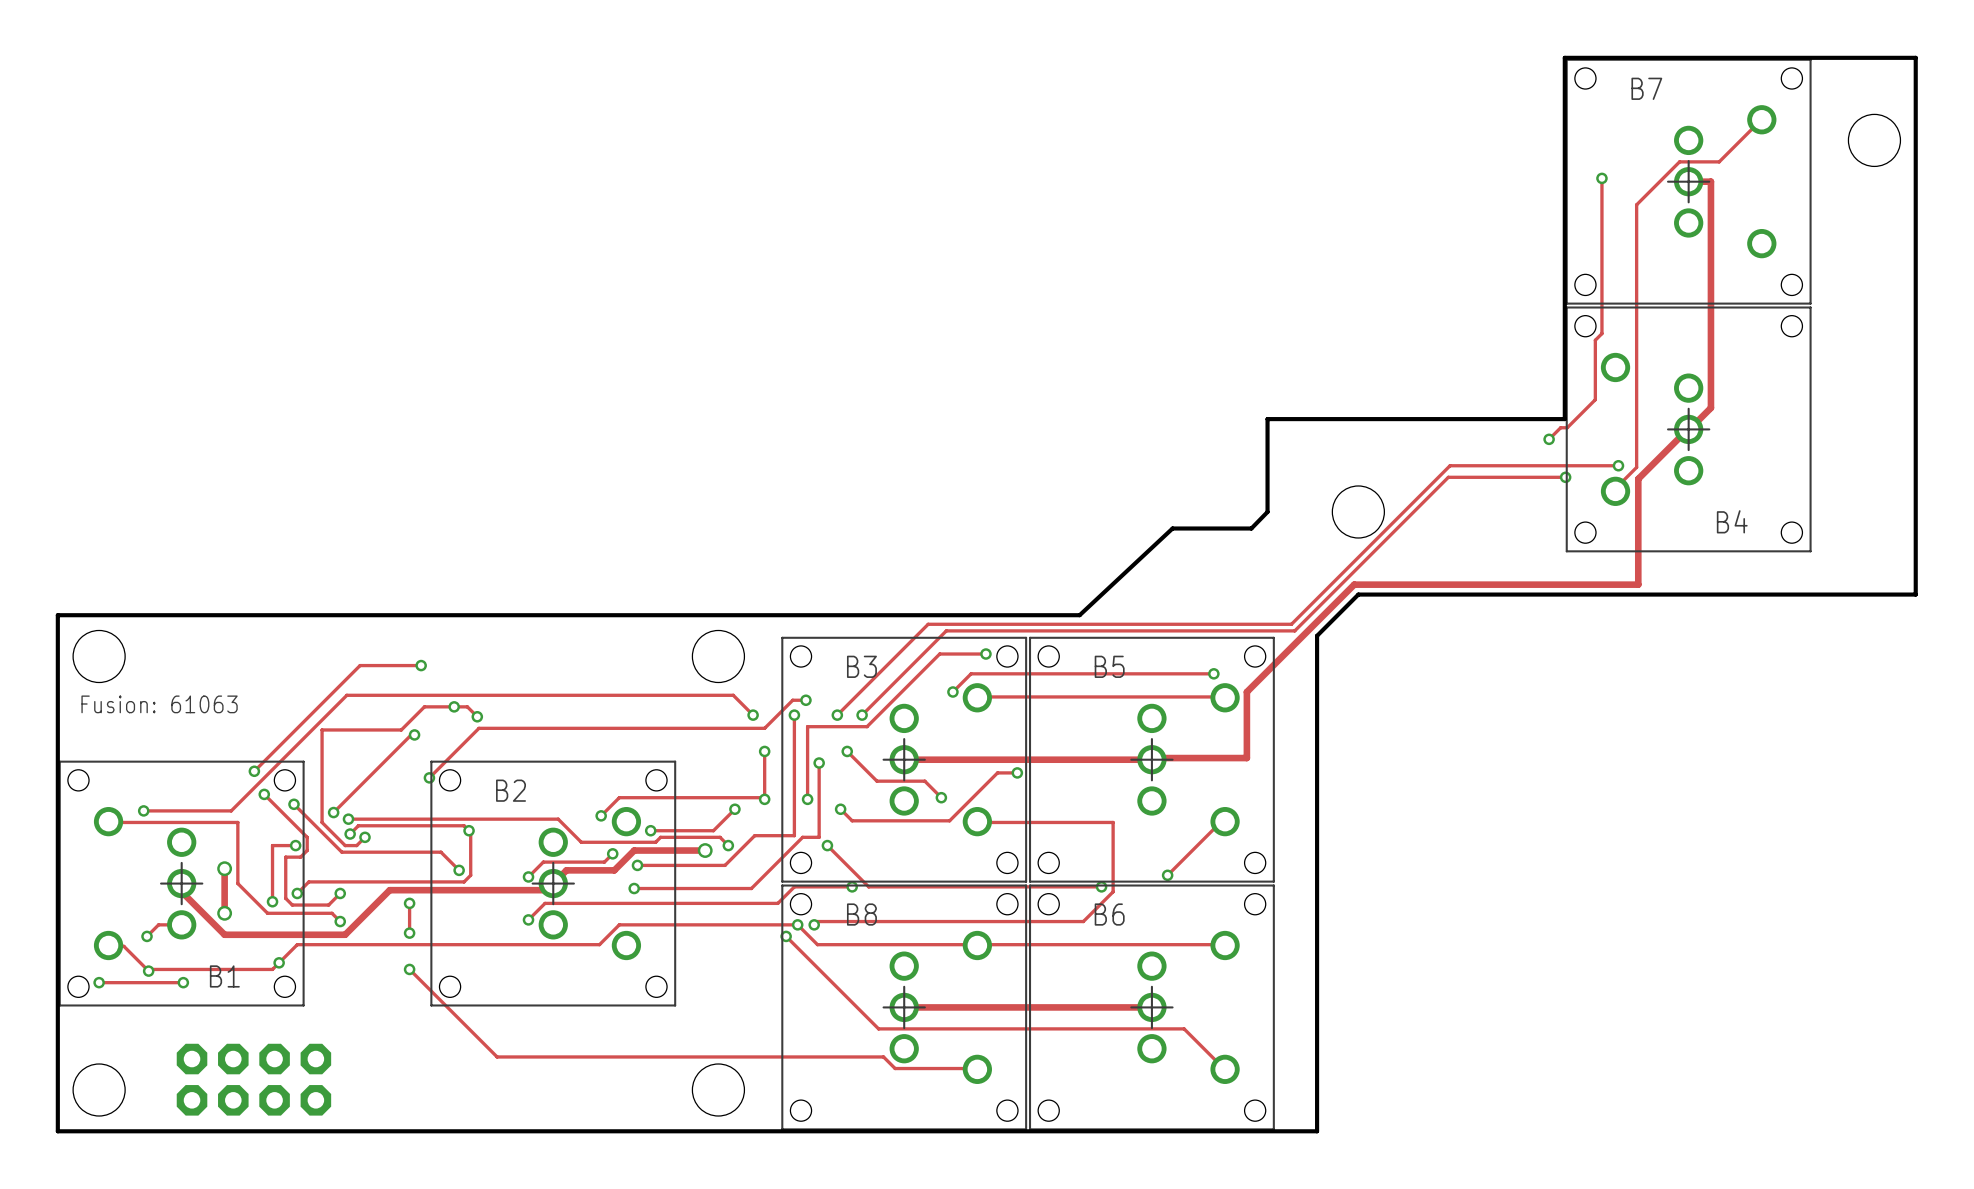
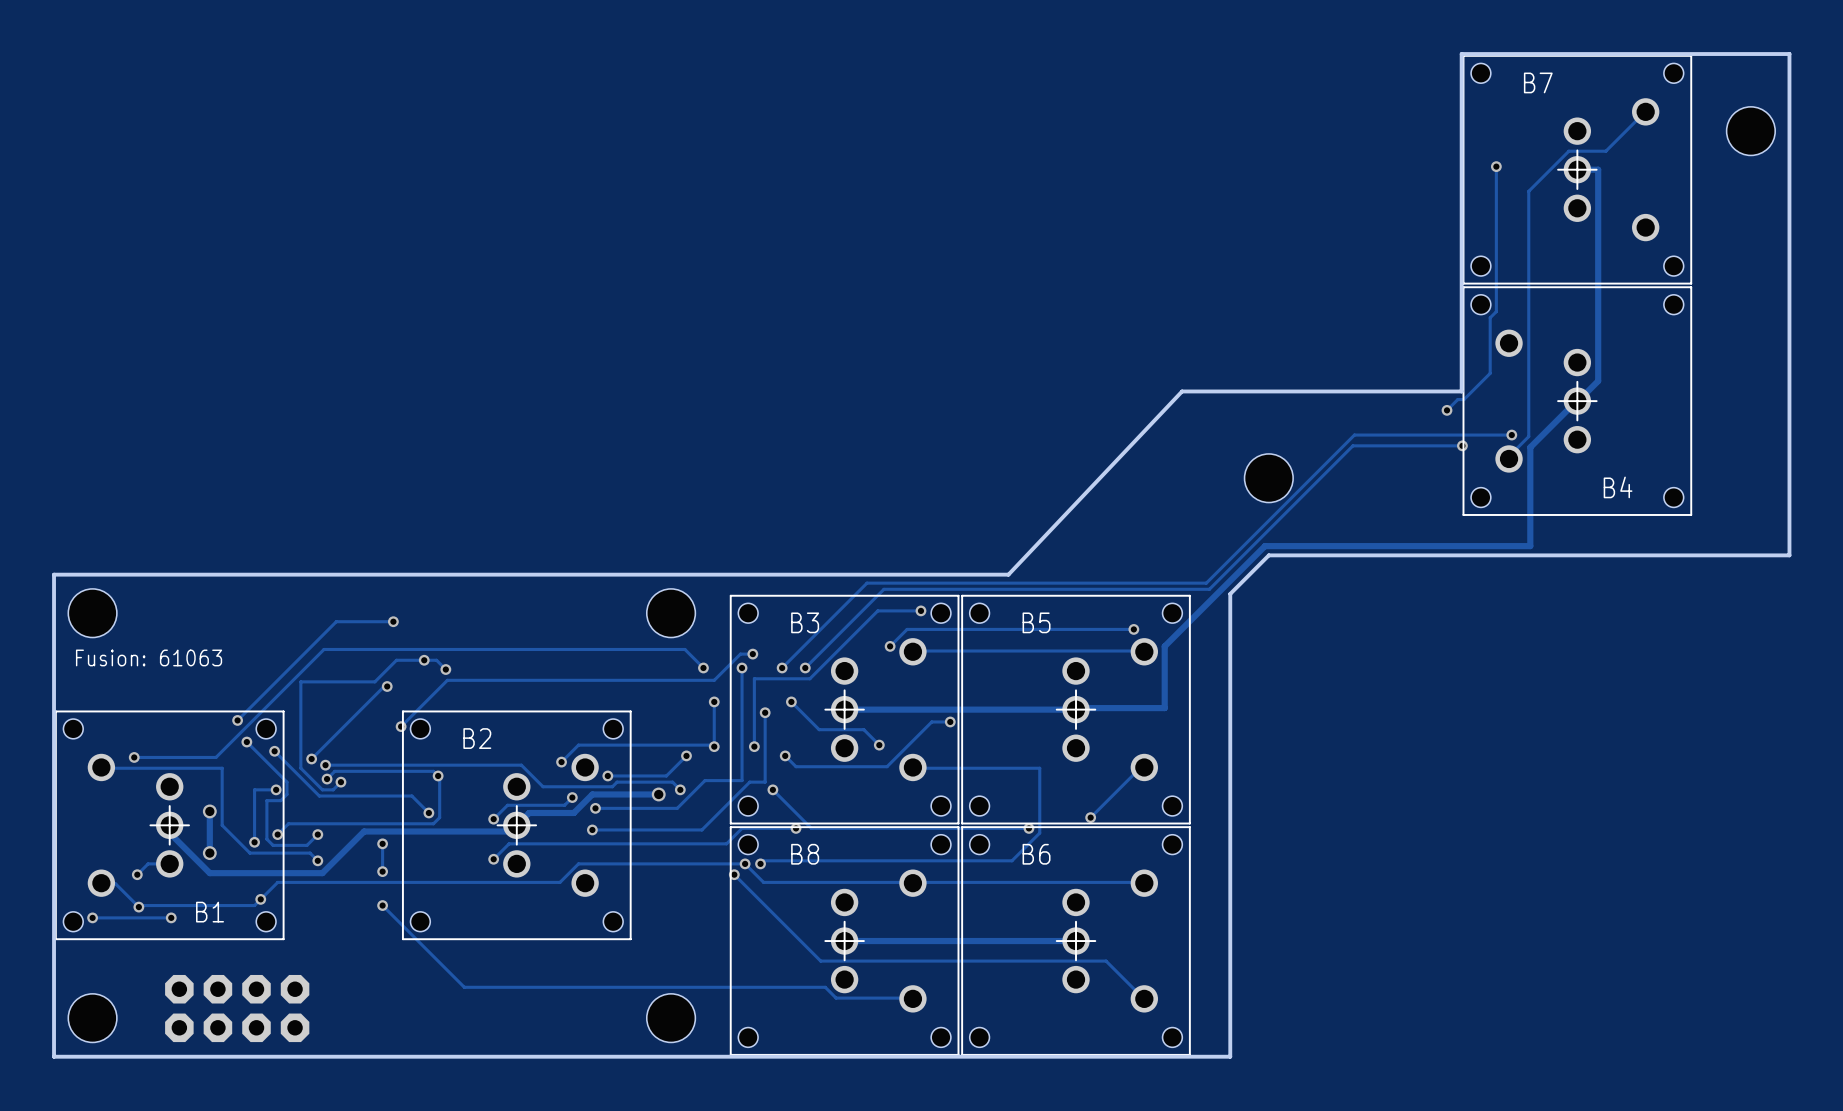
board edge: (1267, 419) (1267, 511) (1251, 528) (1172, 528) (1079, 615) -> (1183, 391) (1008, 574)

